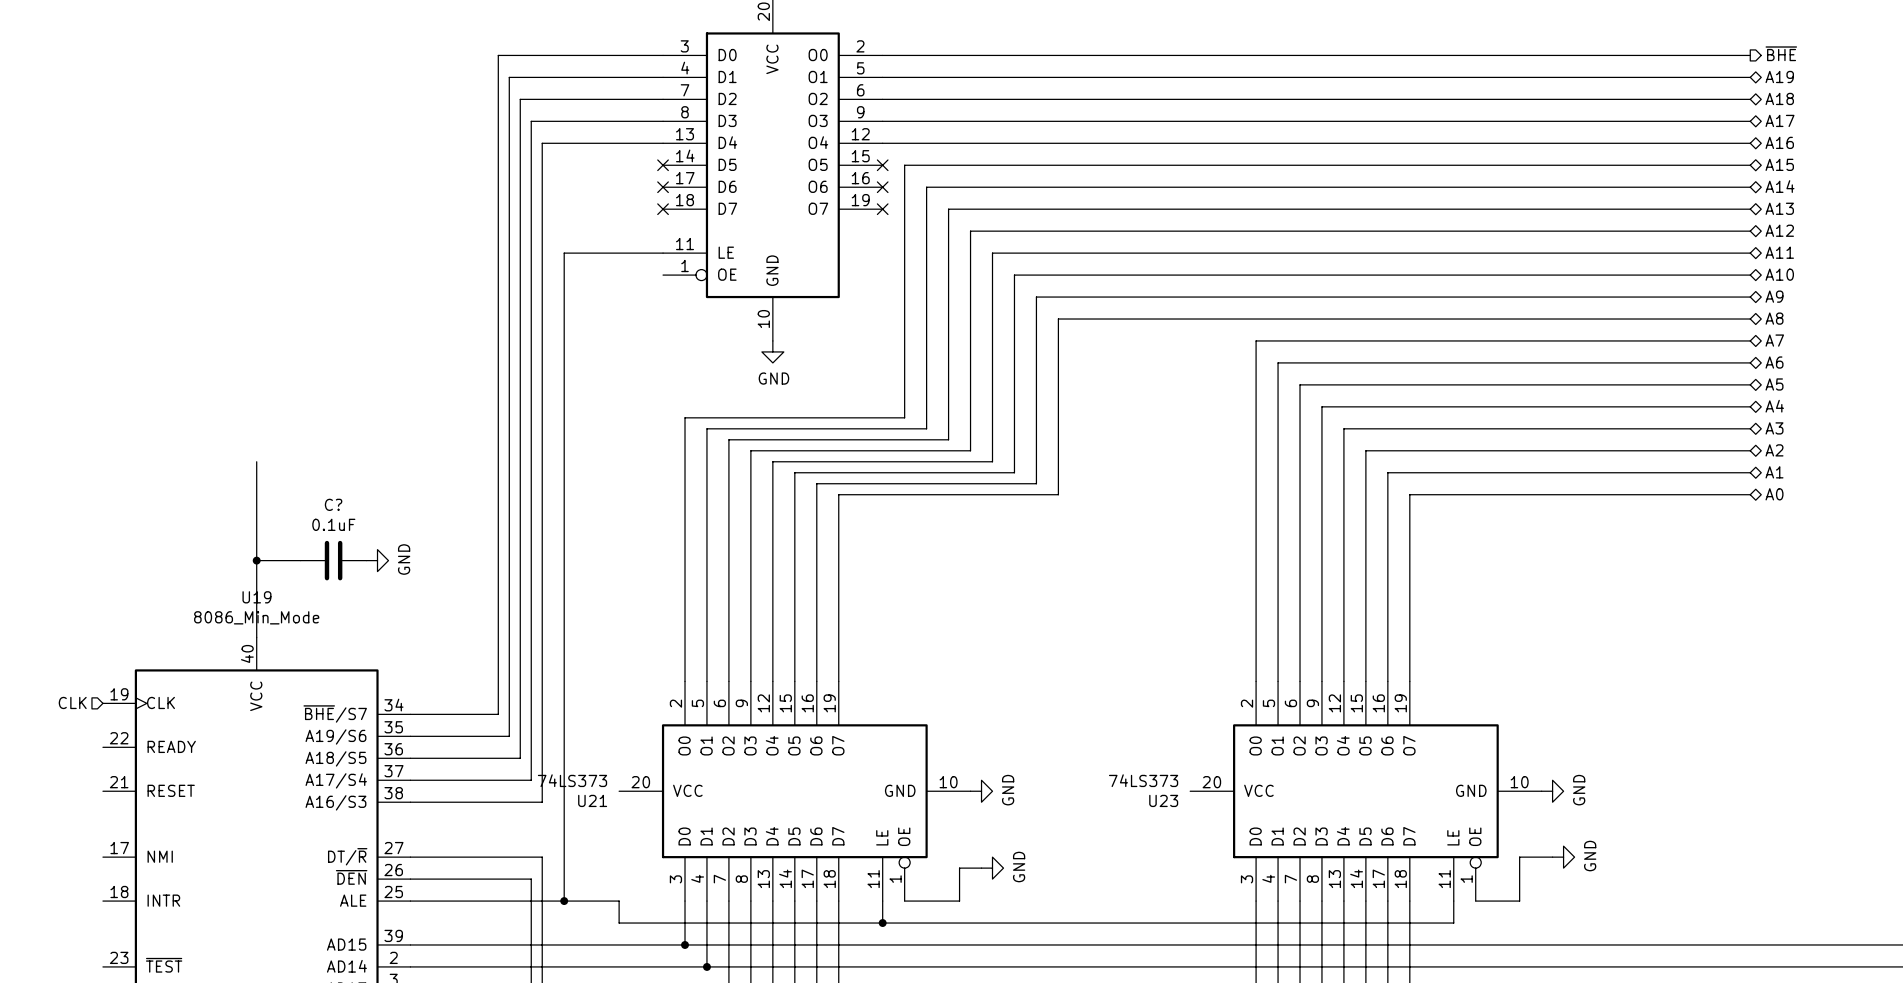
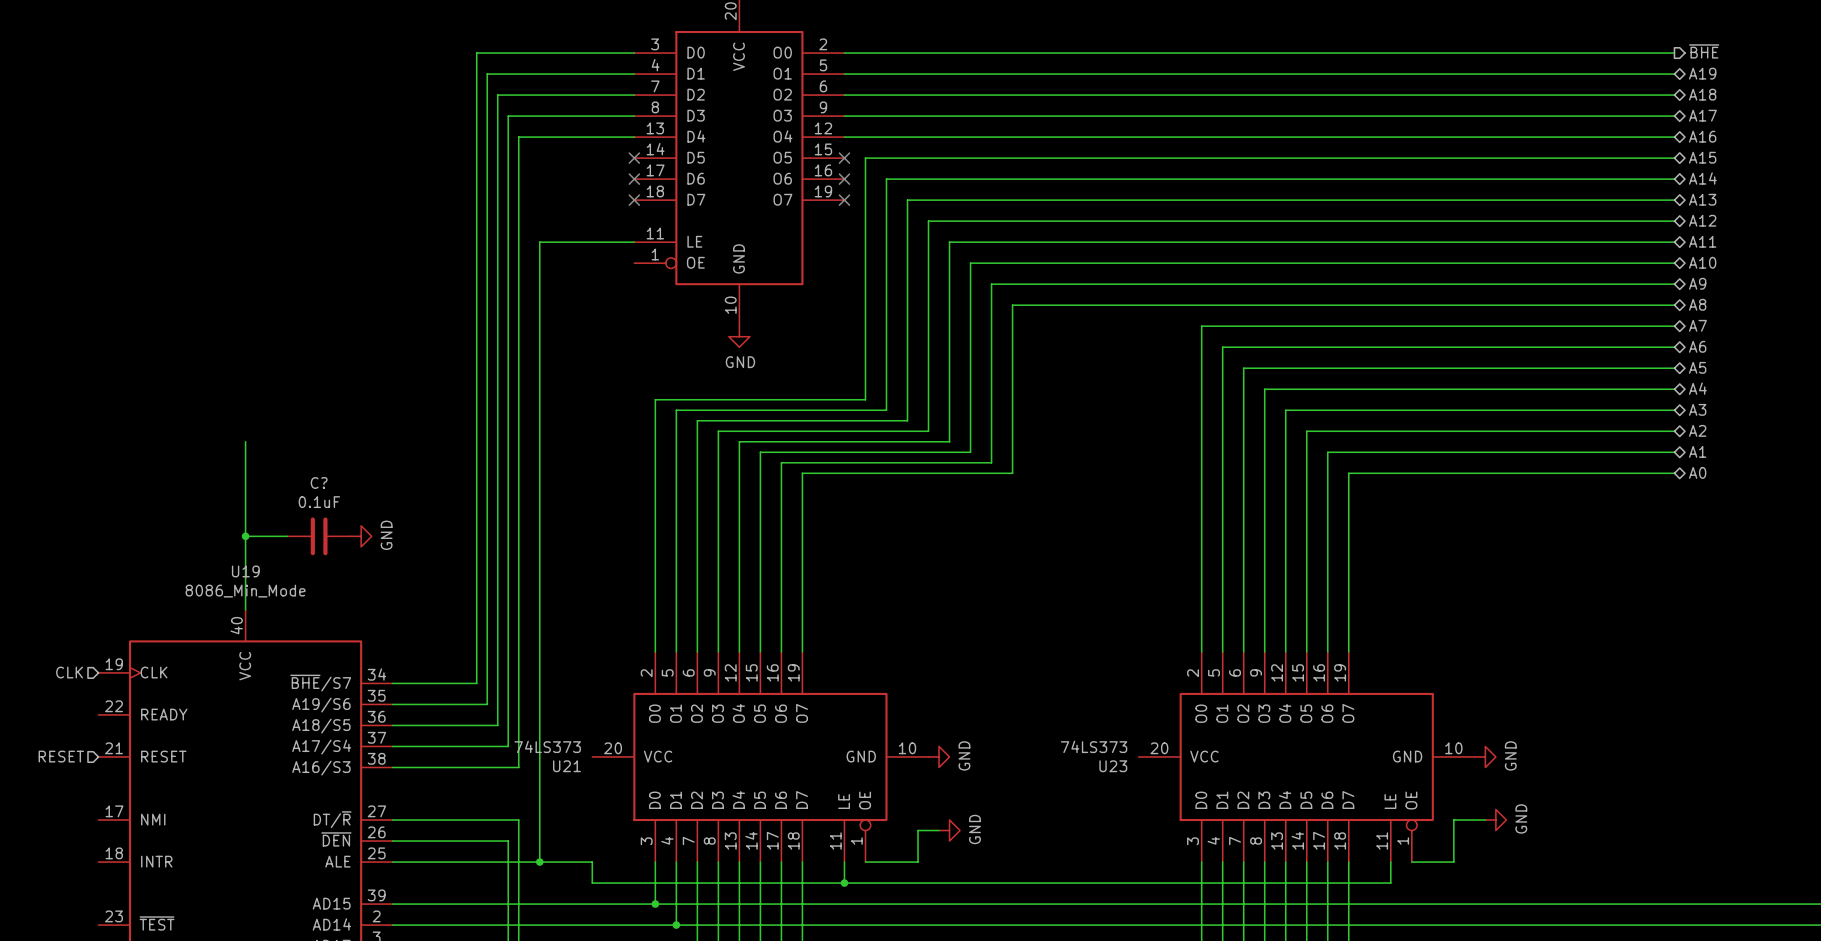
hierarchical label: none -> RESET (61, 756)

